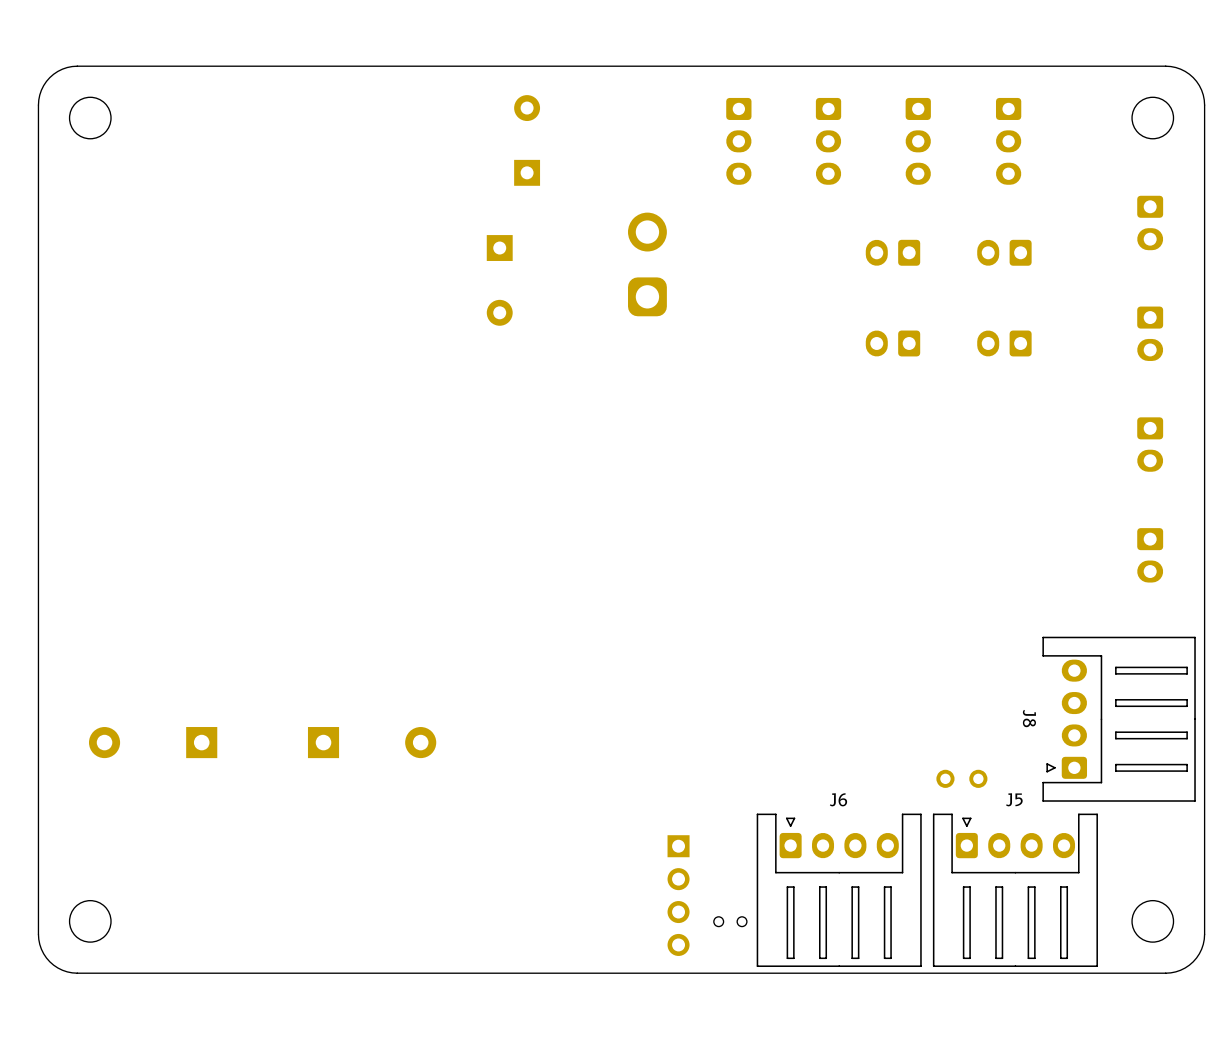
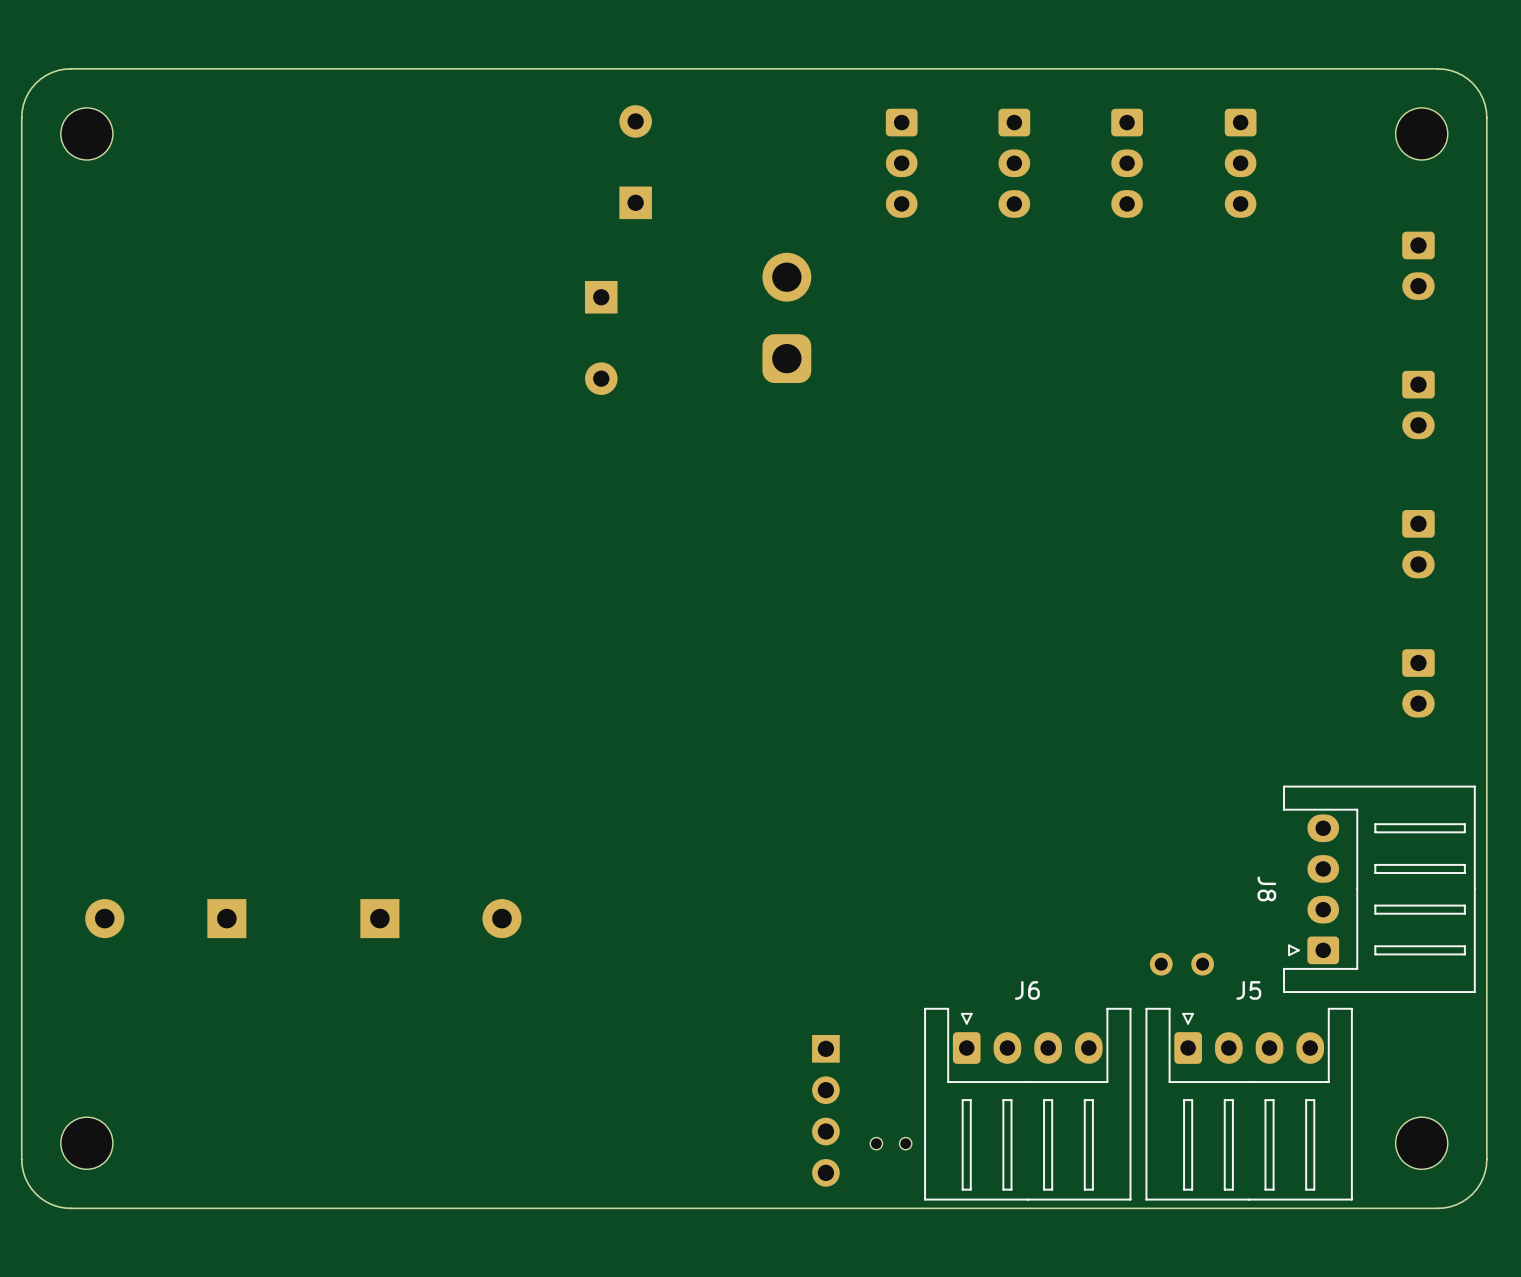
part: (892, 252) -> none
part: (1004, 252) -> none
part: (892, 343) -> none
part: (1004, 343) -> none

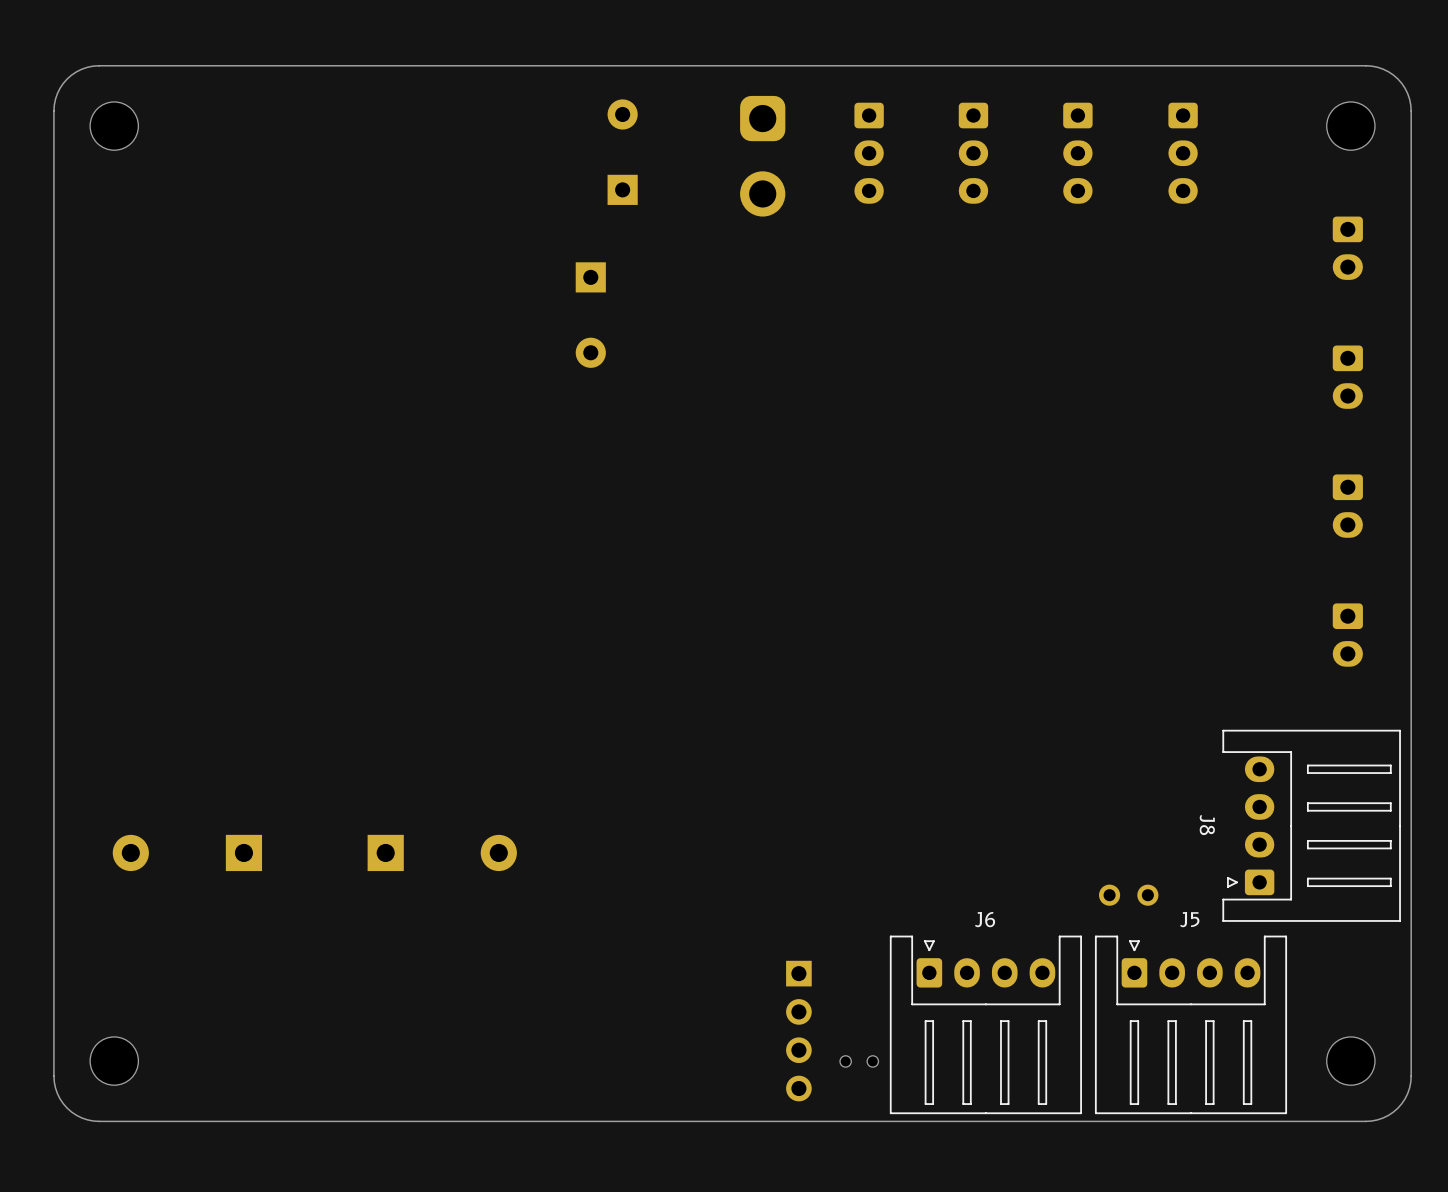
part rotation: 0° (786, 317) -> 180° (762, 156)
part position: (786, 317) -> (762, 156)

